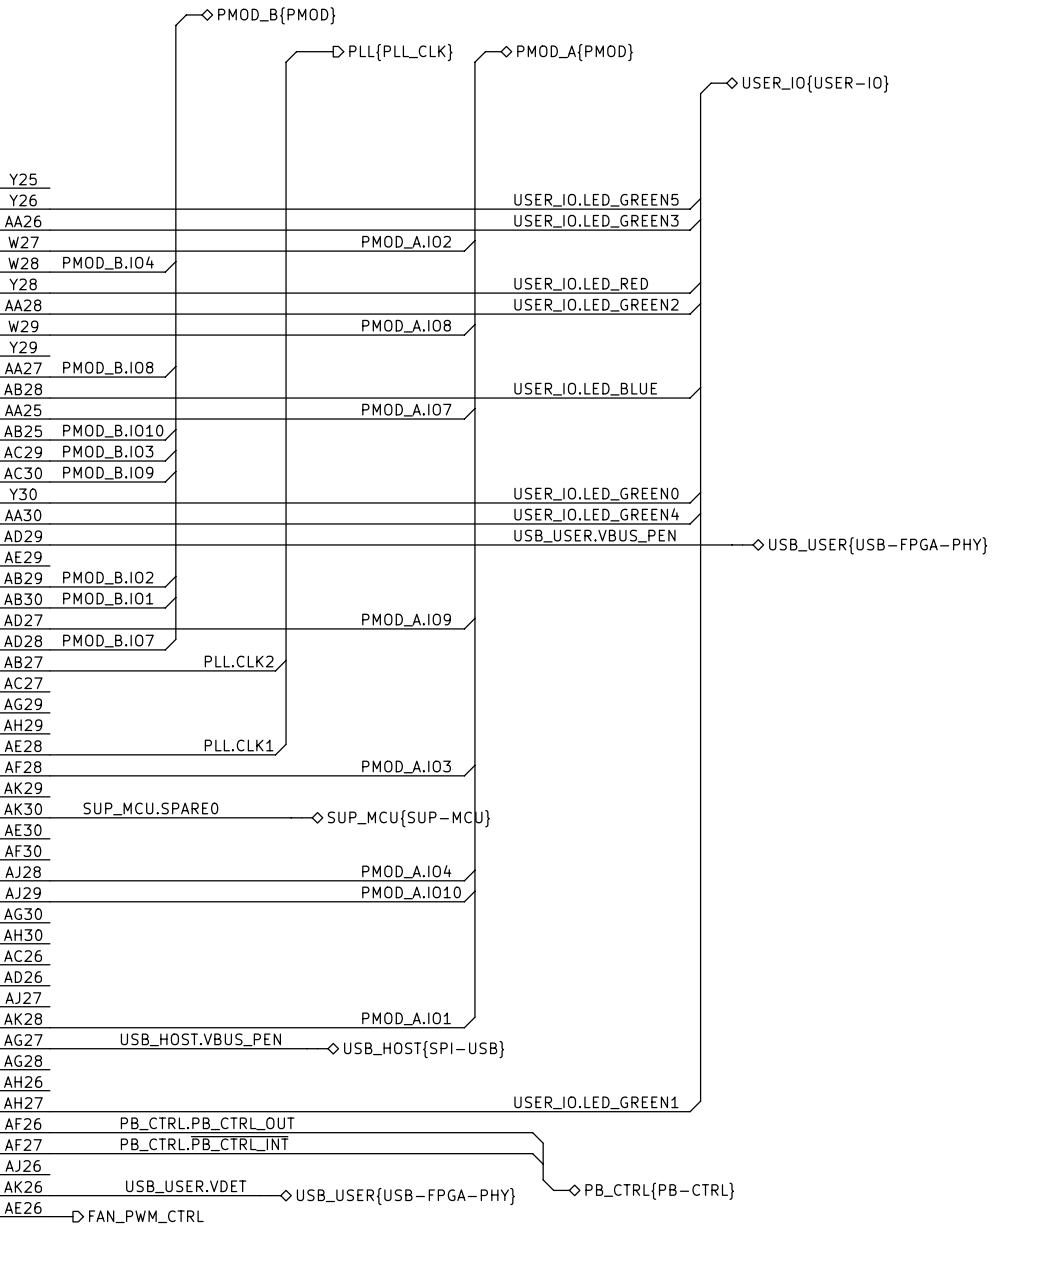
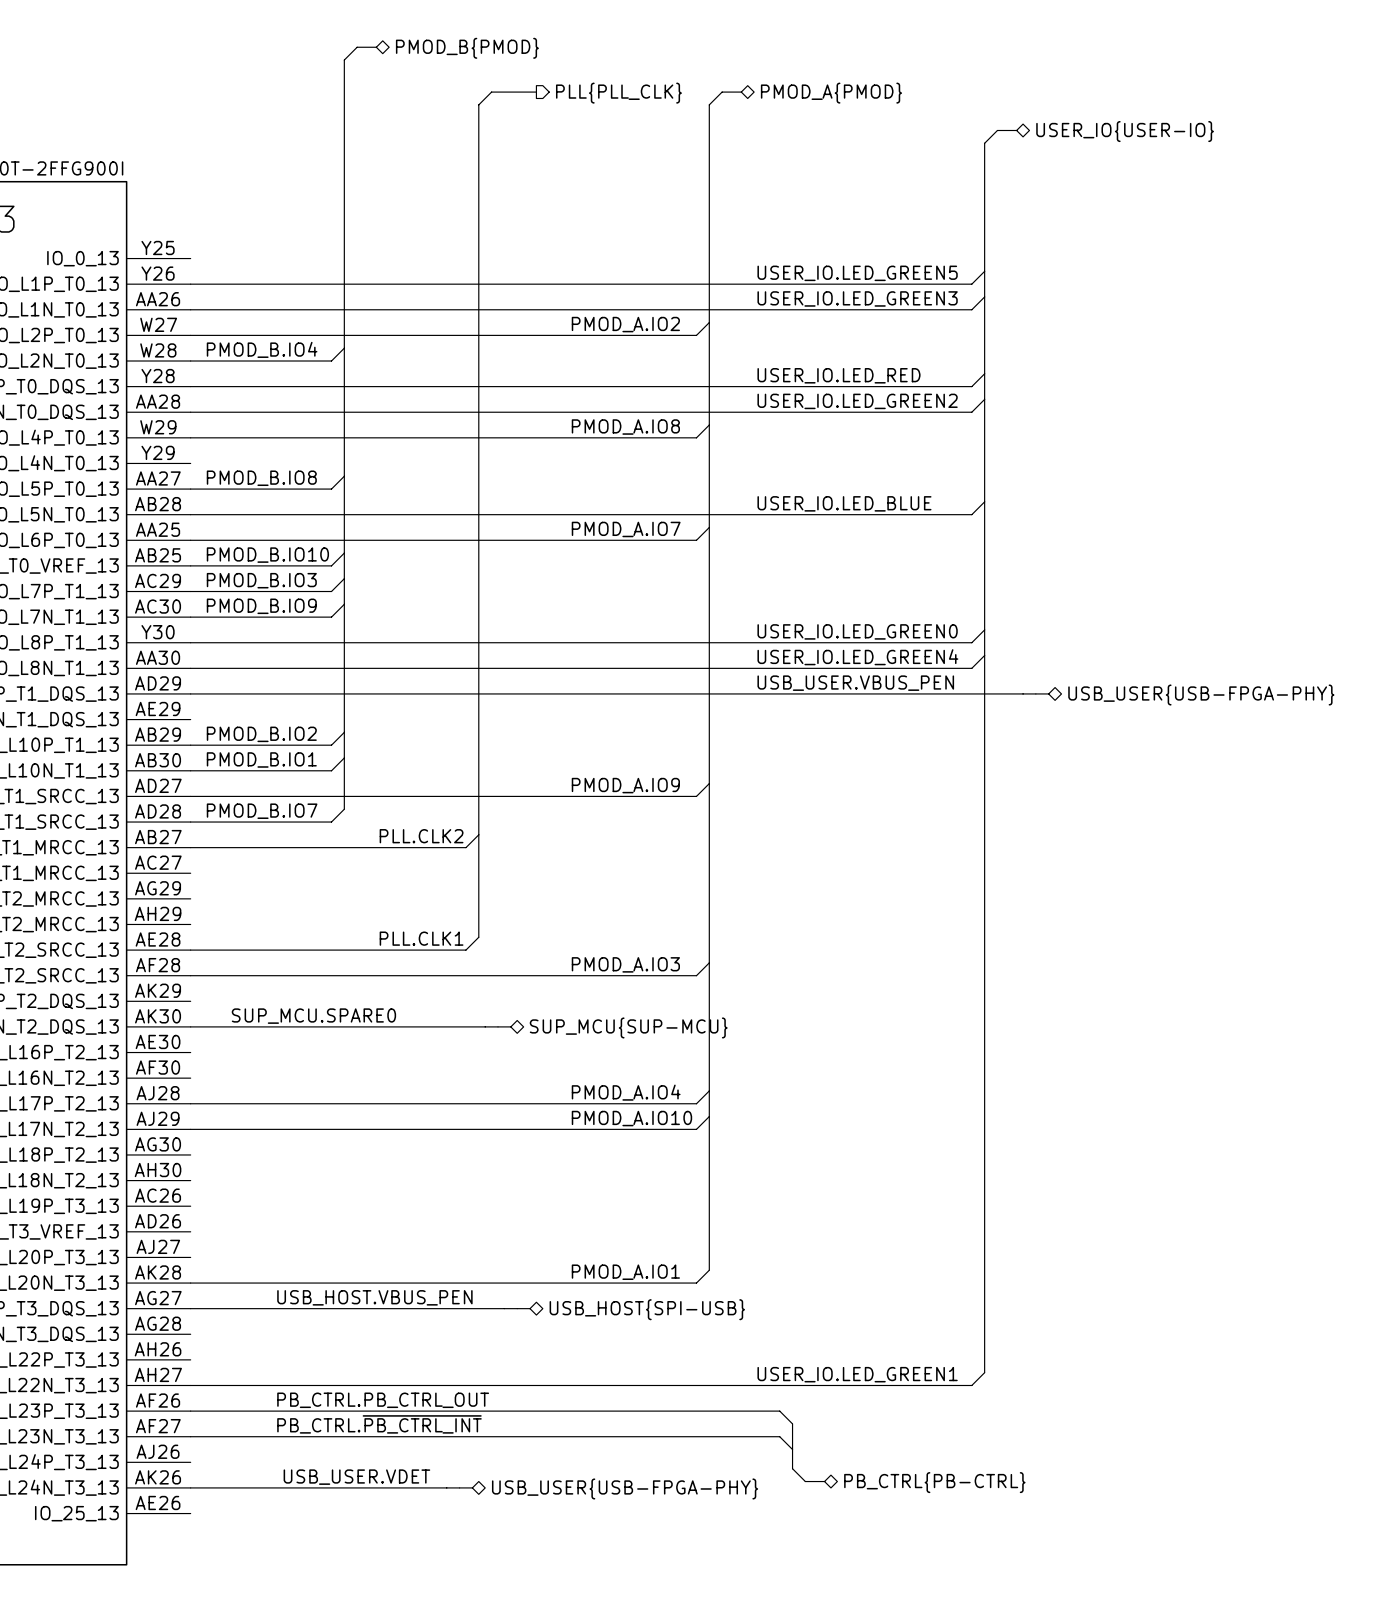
wire: (49, 1216) (72, 1216) -> none
hierarchical label: FAN_PWM_CTRL (146, 1216) -> none

